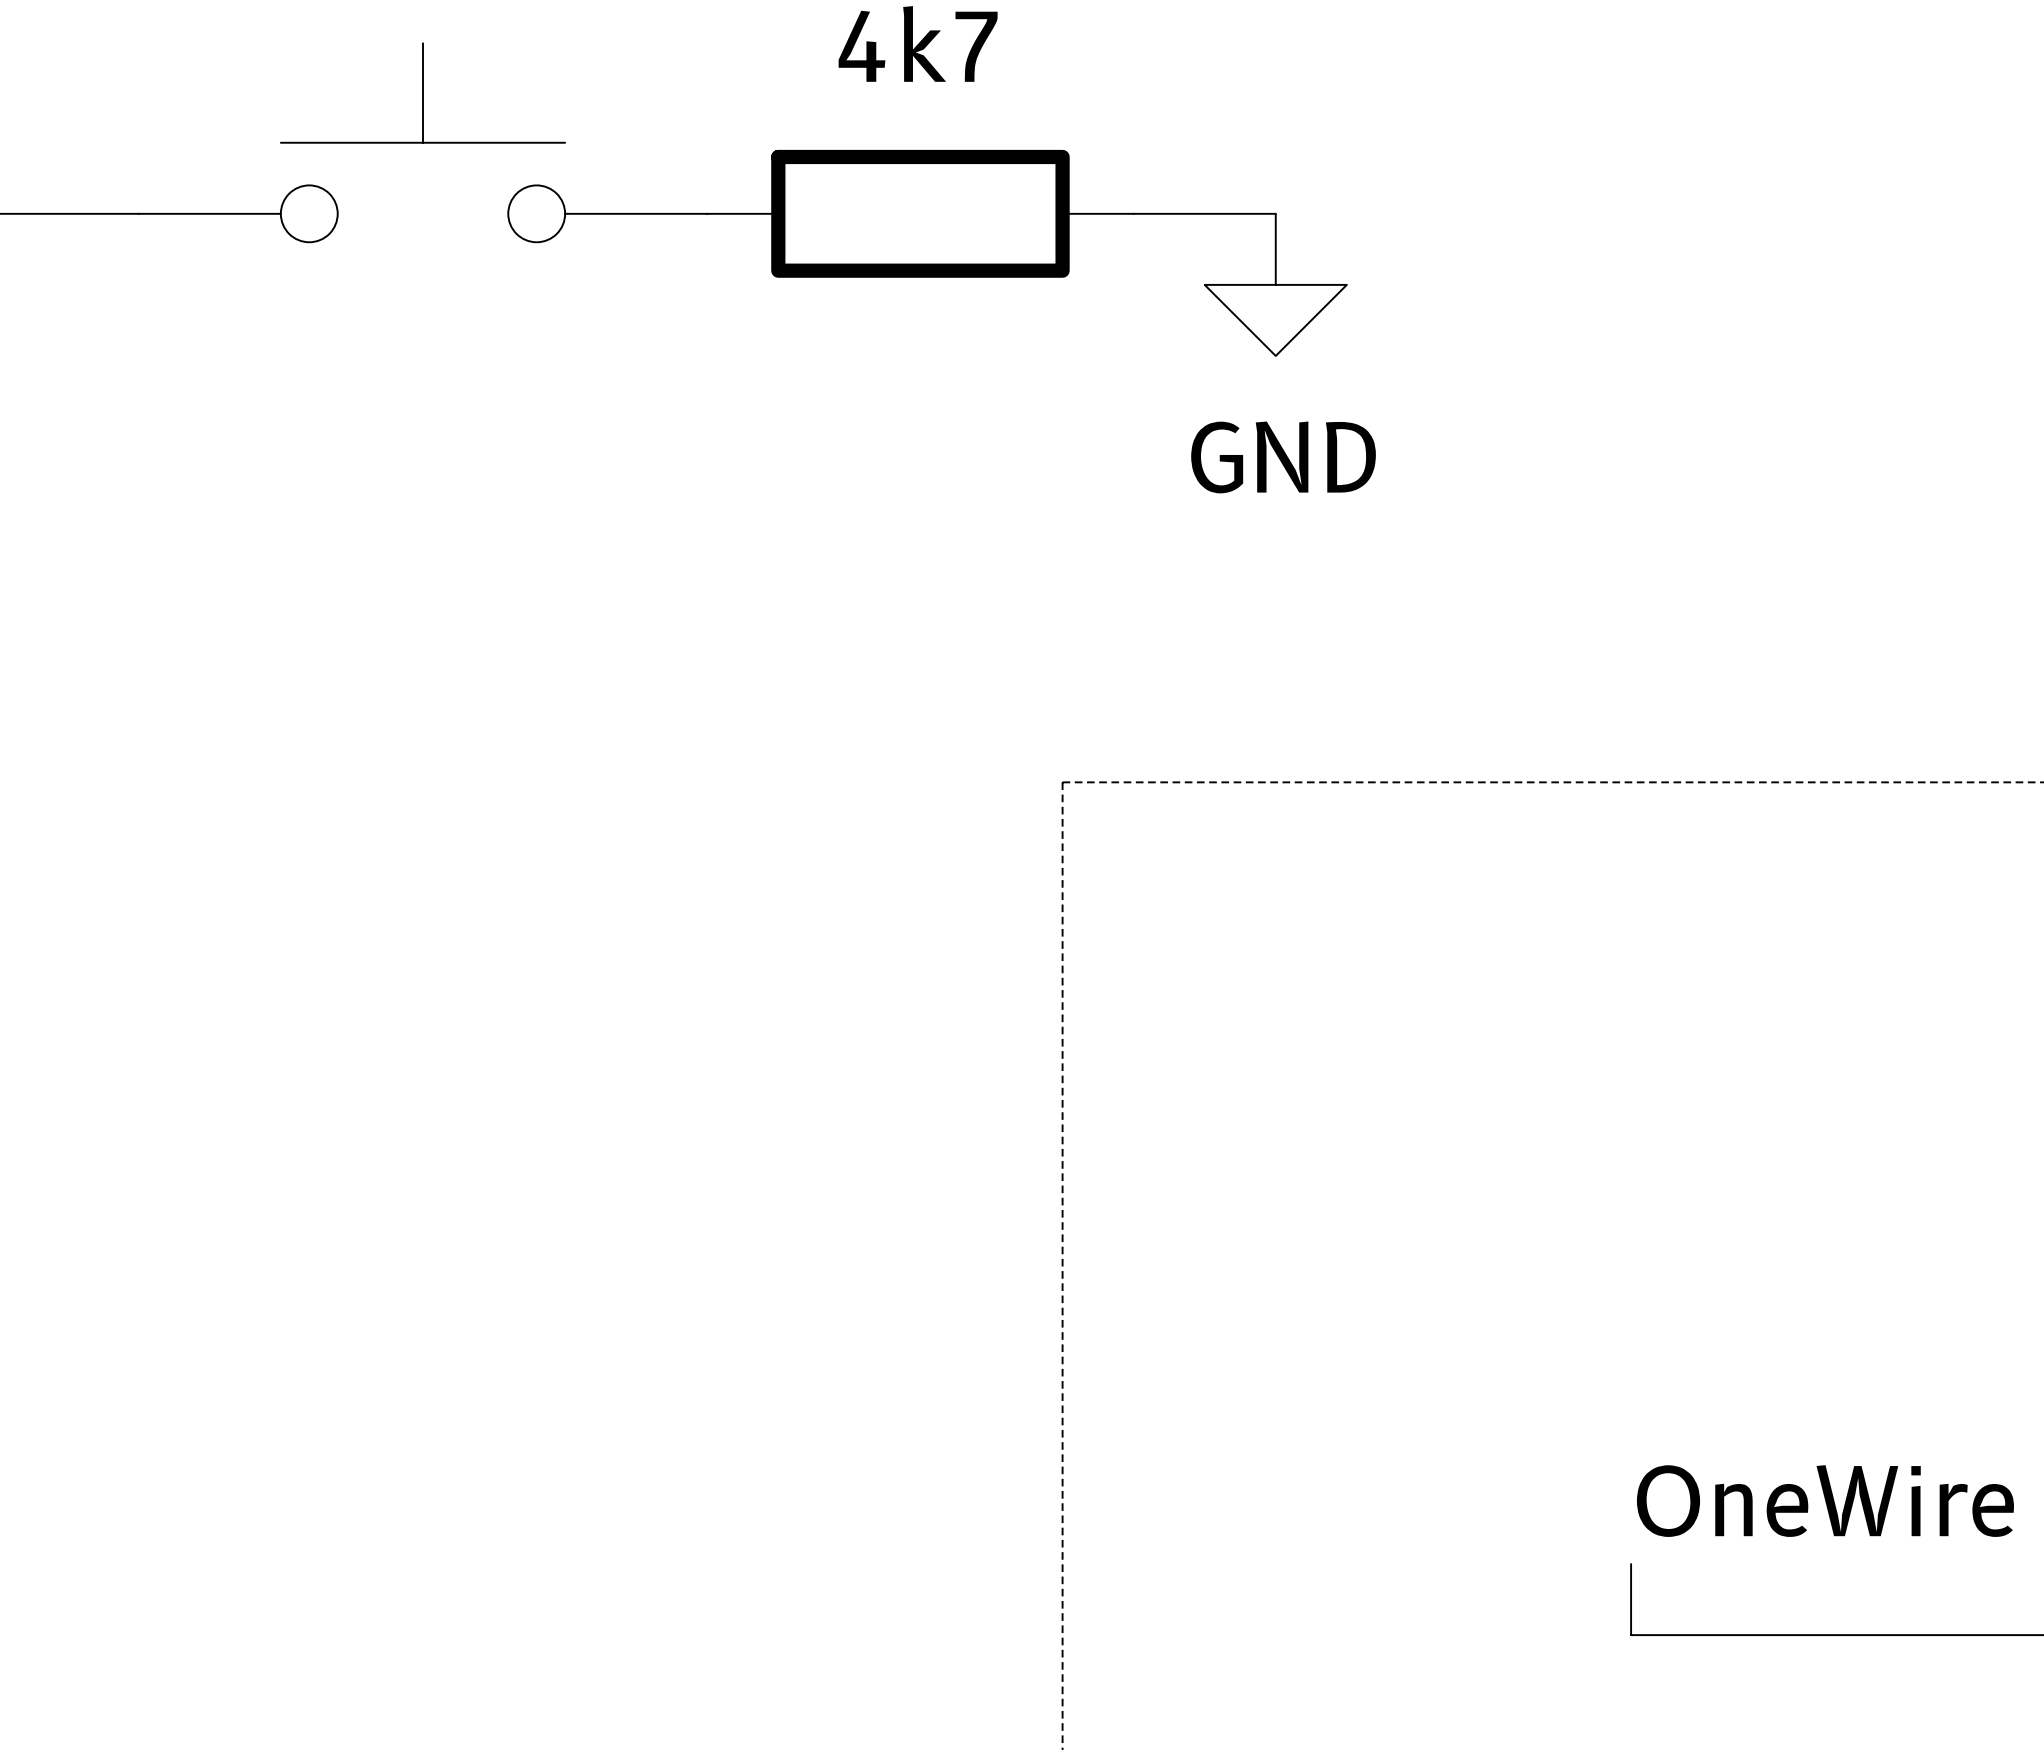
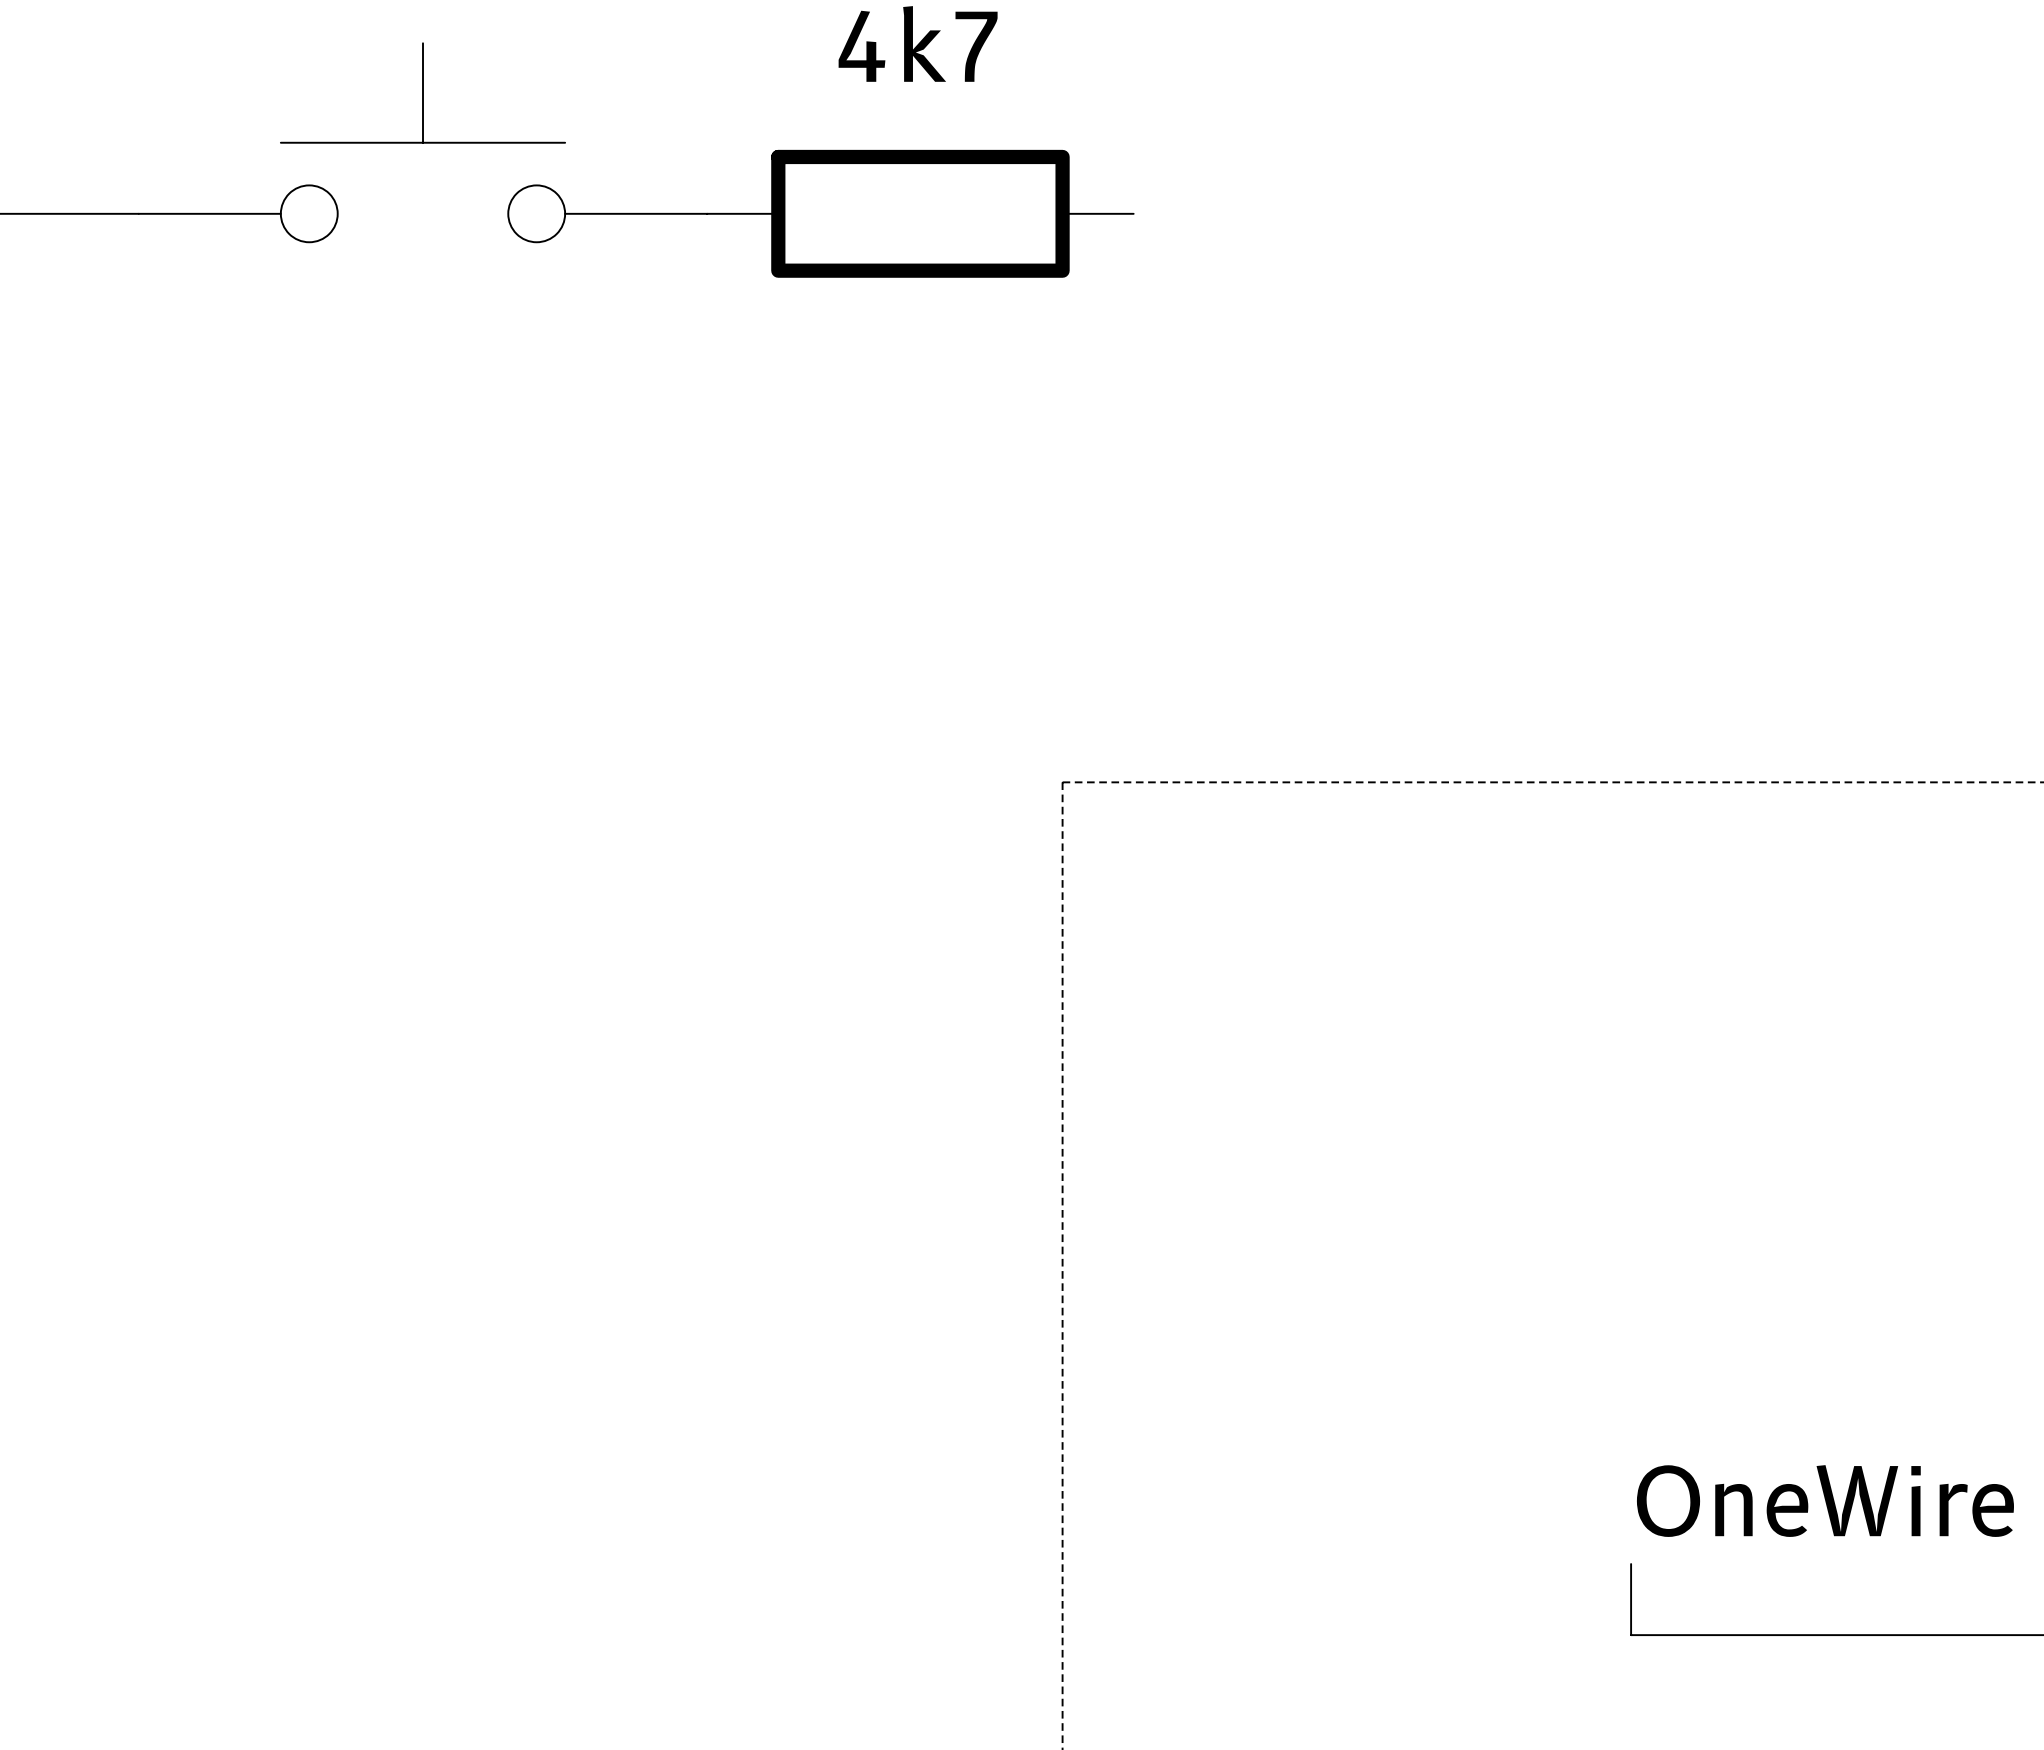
wire: (1133, 213) (1275, 213) -> none
power symbol: GND (1275, 284) -> none

